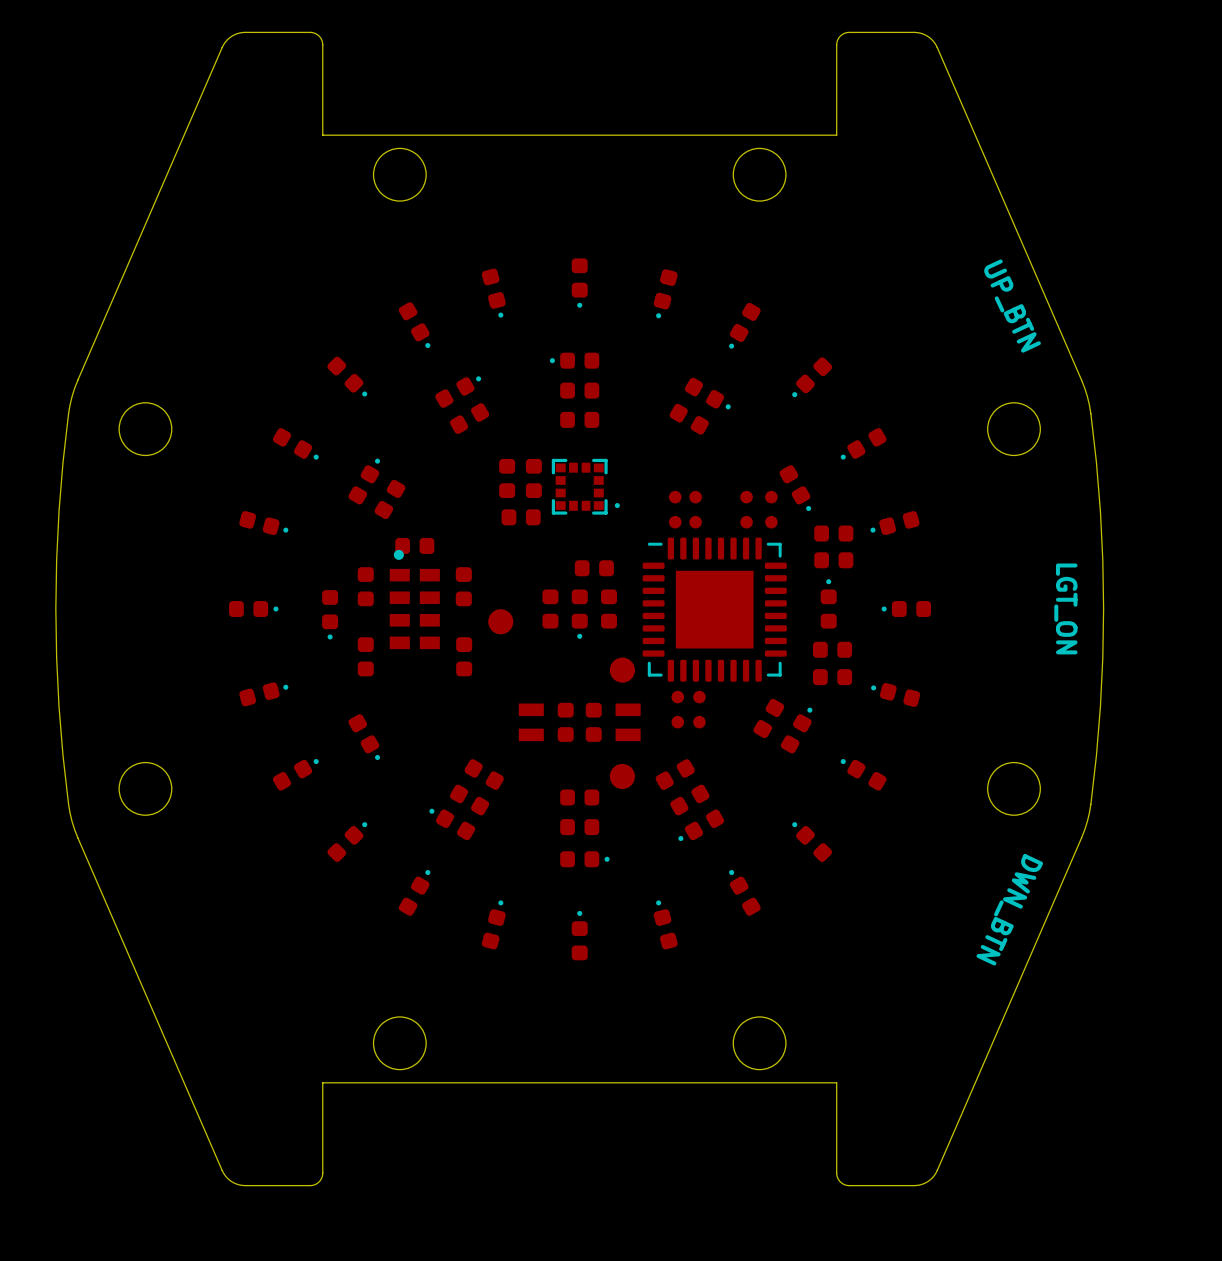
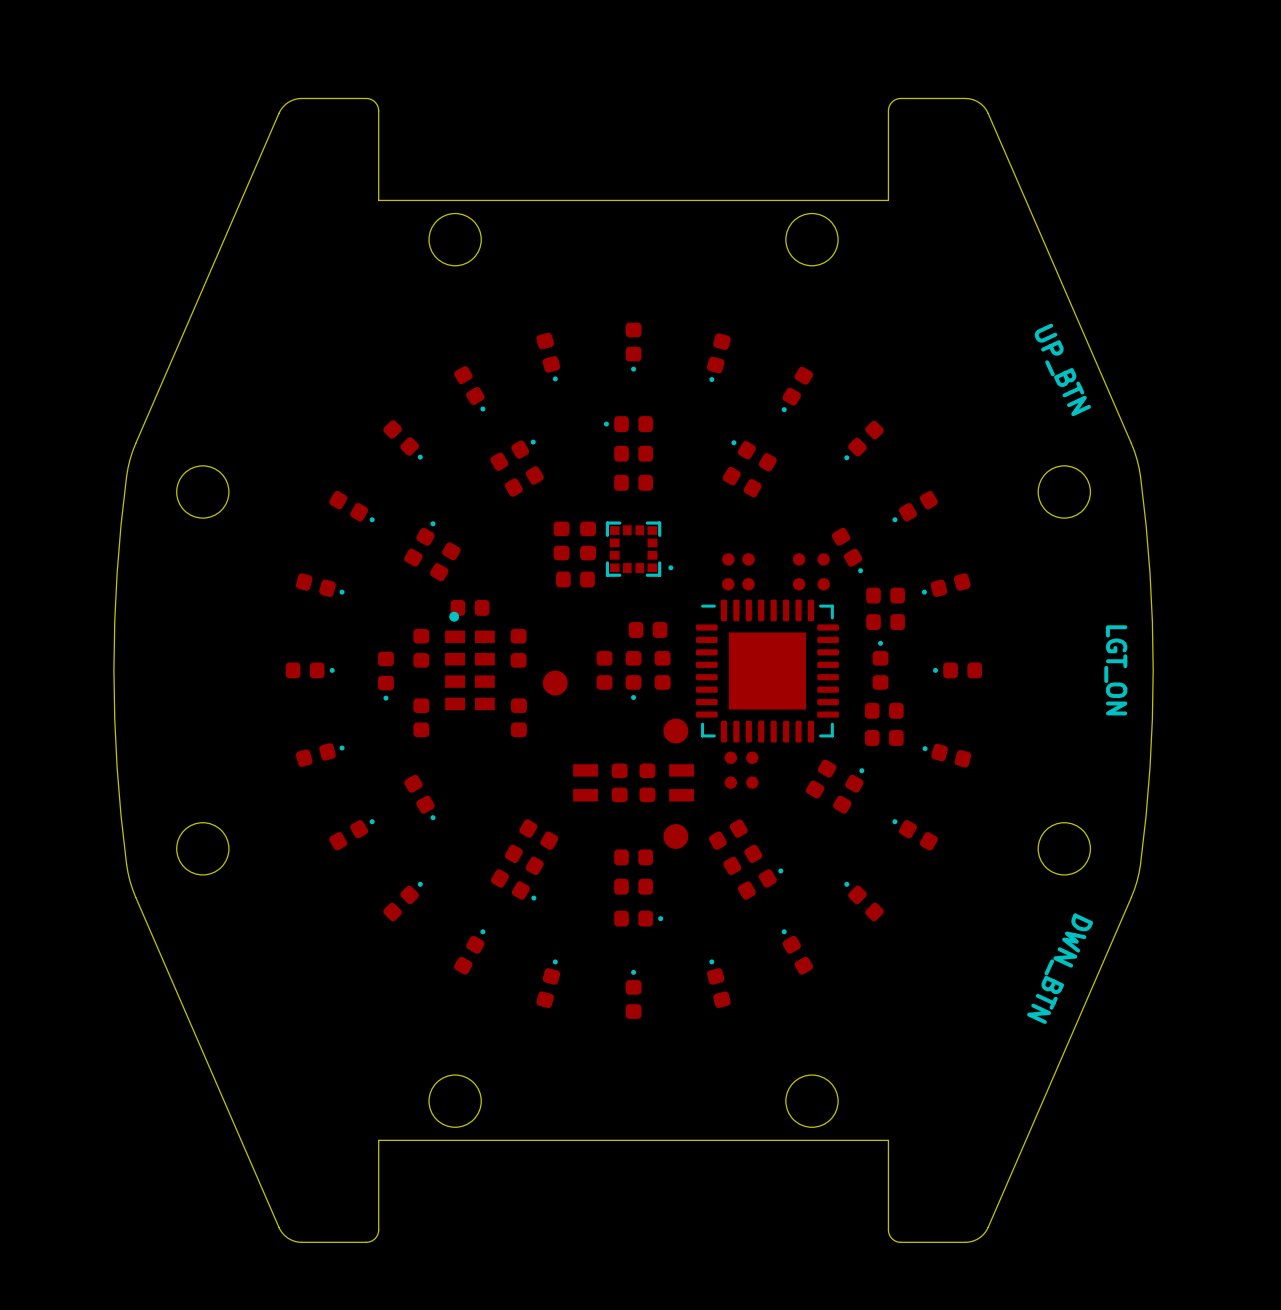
part rotation: 0° (707, 393) -> 180° (754, 455)
part rotation: 0° (452, 824) -> 180° (513, 884)
part rotation: 0° (701, 825) -> 180° (760, 884)

